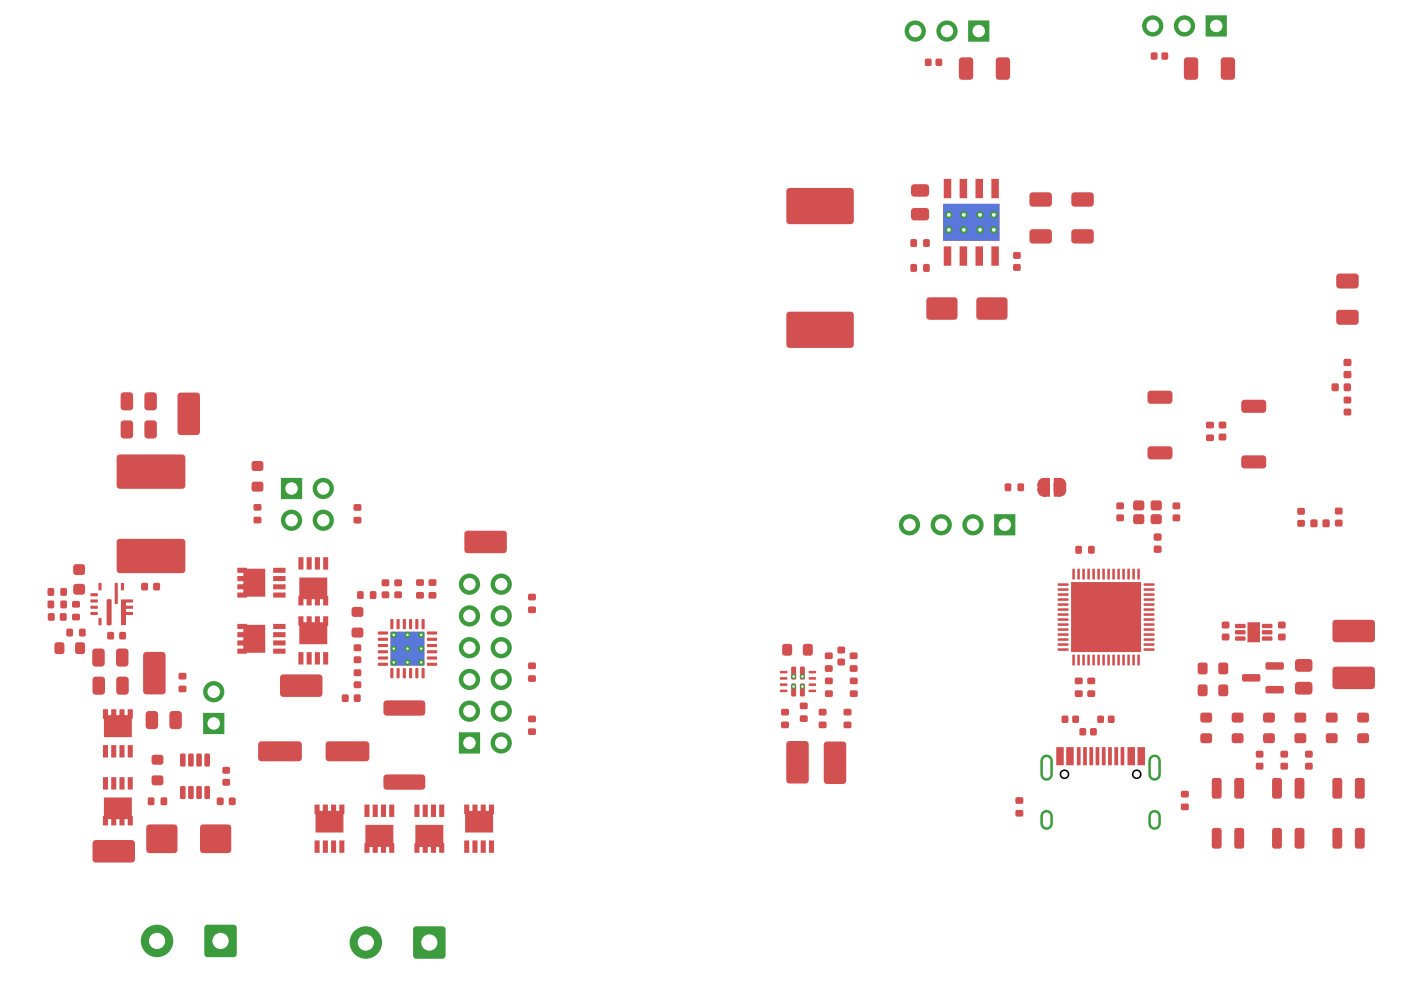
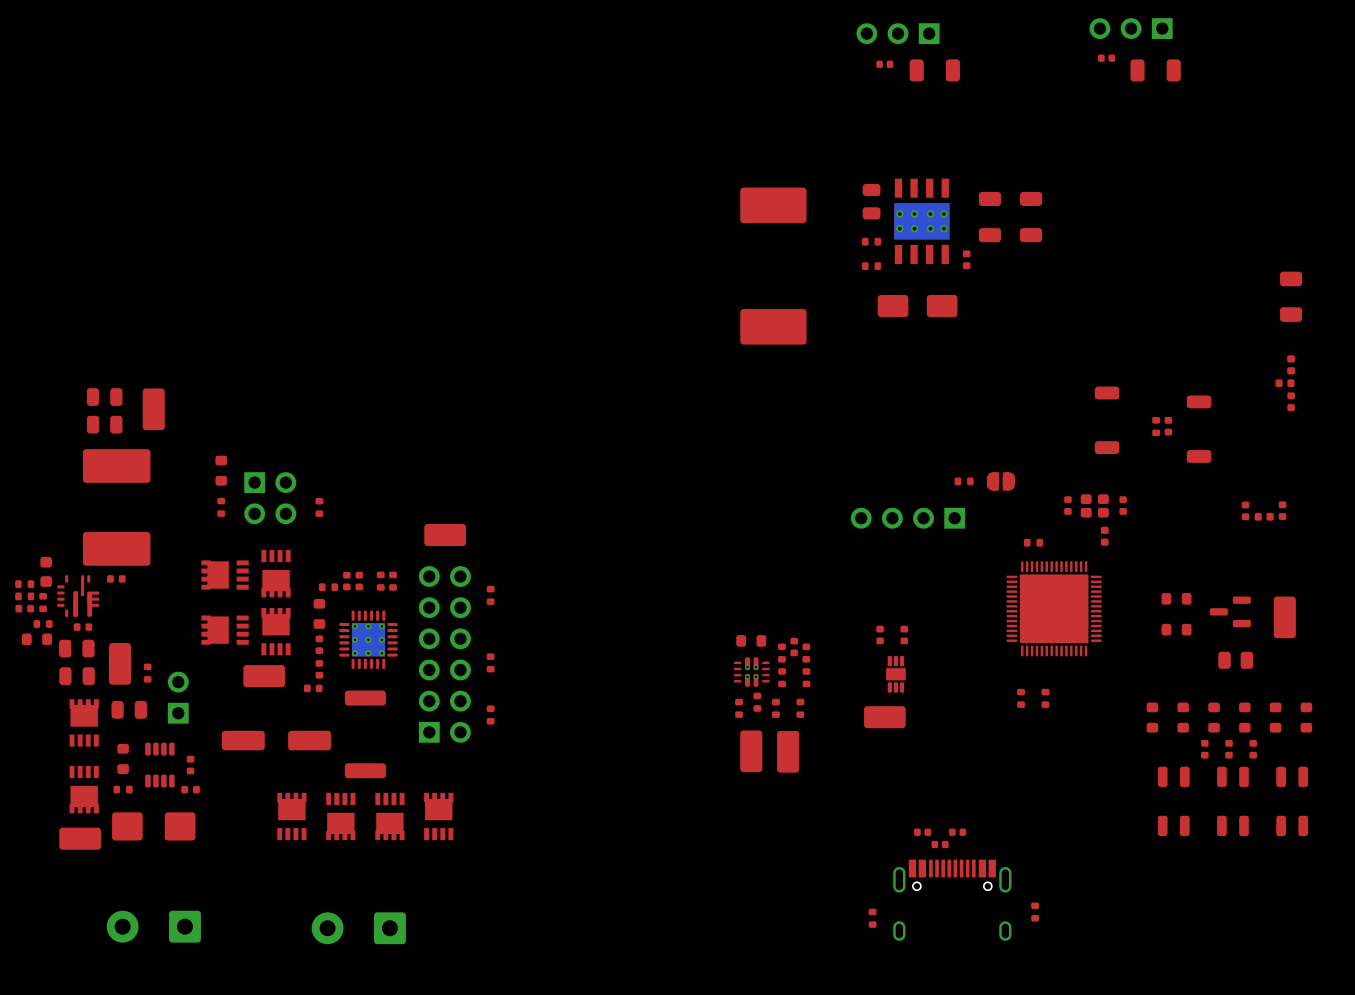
part: none -> (1176, 598)
part footprint: [1221, 621, 1230, 641] -> [1161, 623, 1192, 636]
part footprint: [1277, 621, 1286, 641] -> [1209, 596, 1251, 628]
part rotation: 0° (1353, 631) -> 90° clockwise (1284, 617)
part: (1253, 632) -> none
part: none -> (880, 635)
part: none -> (904, 635)
part: (1212, 668) -> none
part rotation: 0° (1303, 676) -> 90° clockwise (1235, 660)
part: (1262, 677) -> none
part: (1353, 677) -> none
part: none -> (895, 674)
part: (1078, 687) -> none
part: (1091, 687) -> none
part: (1212, 690) -> none
part: none -> (1021, 698)
part: none -> (1045, 698)
part: (1070, 719) -> none
part: (1105, 719) -> none
part: none -> (884, 717)
part: (1088, 731) -> none
part position: (1100, 788) -> (952, 900)
part: (1184, 800) -> none
part: (1019, 806) -> none
part: none -> (922, 832)
part: none -> (957, 832)
part: none -> (940, 844)
part: none -> (1035, 912)
part: none -> (872, 918)

